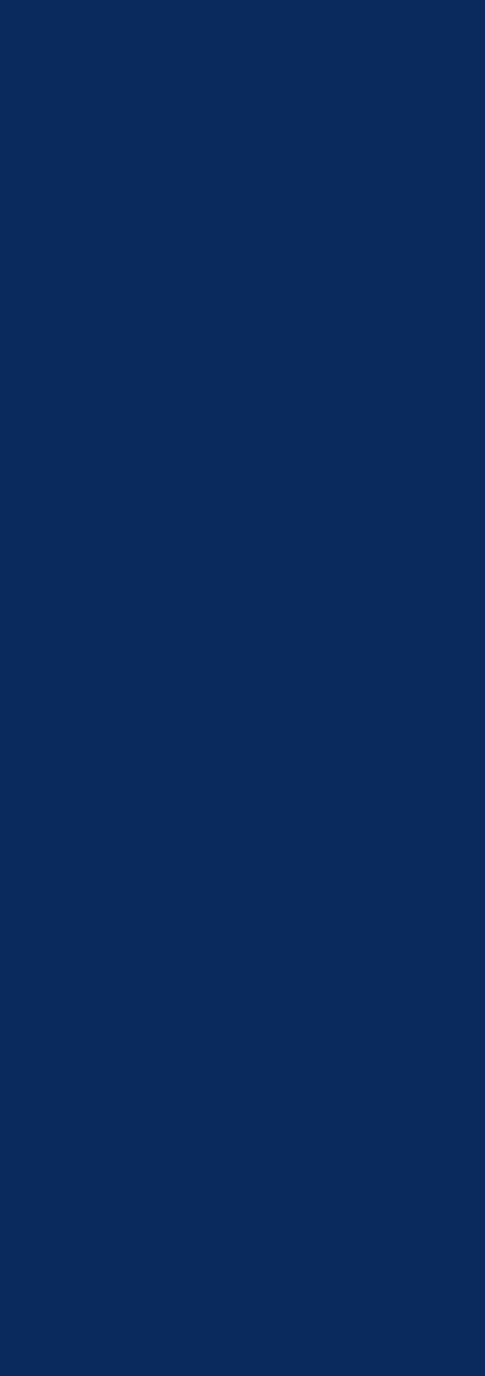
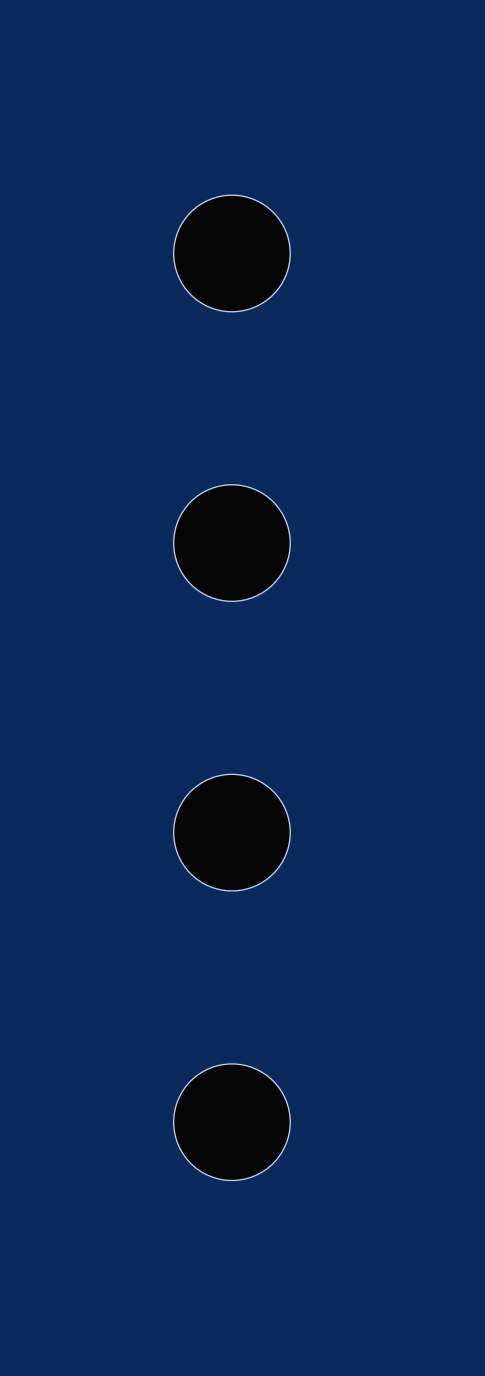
part: none -> (231, 253)
part: none -> (231, 543)
part: none -> (231, 832)
part: none -> (231, 1122)

